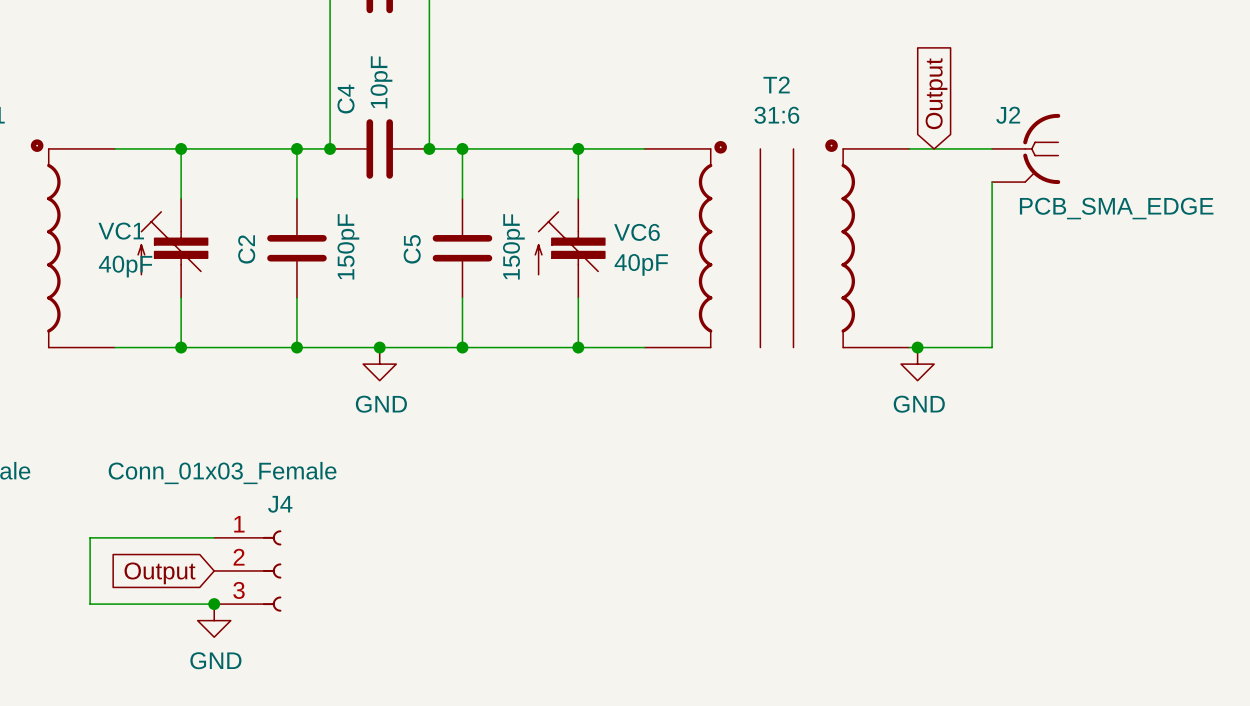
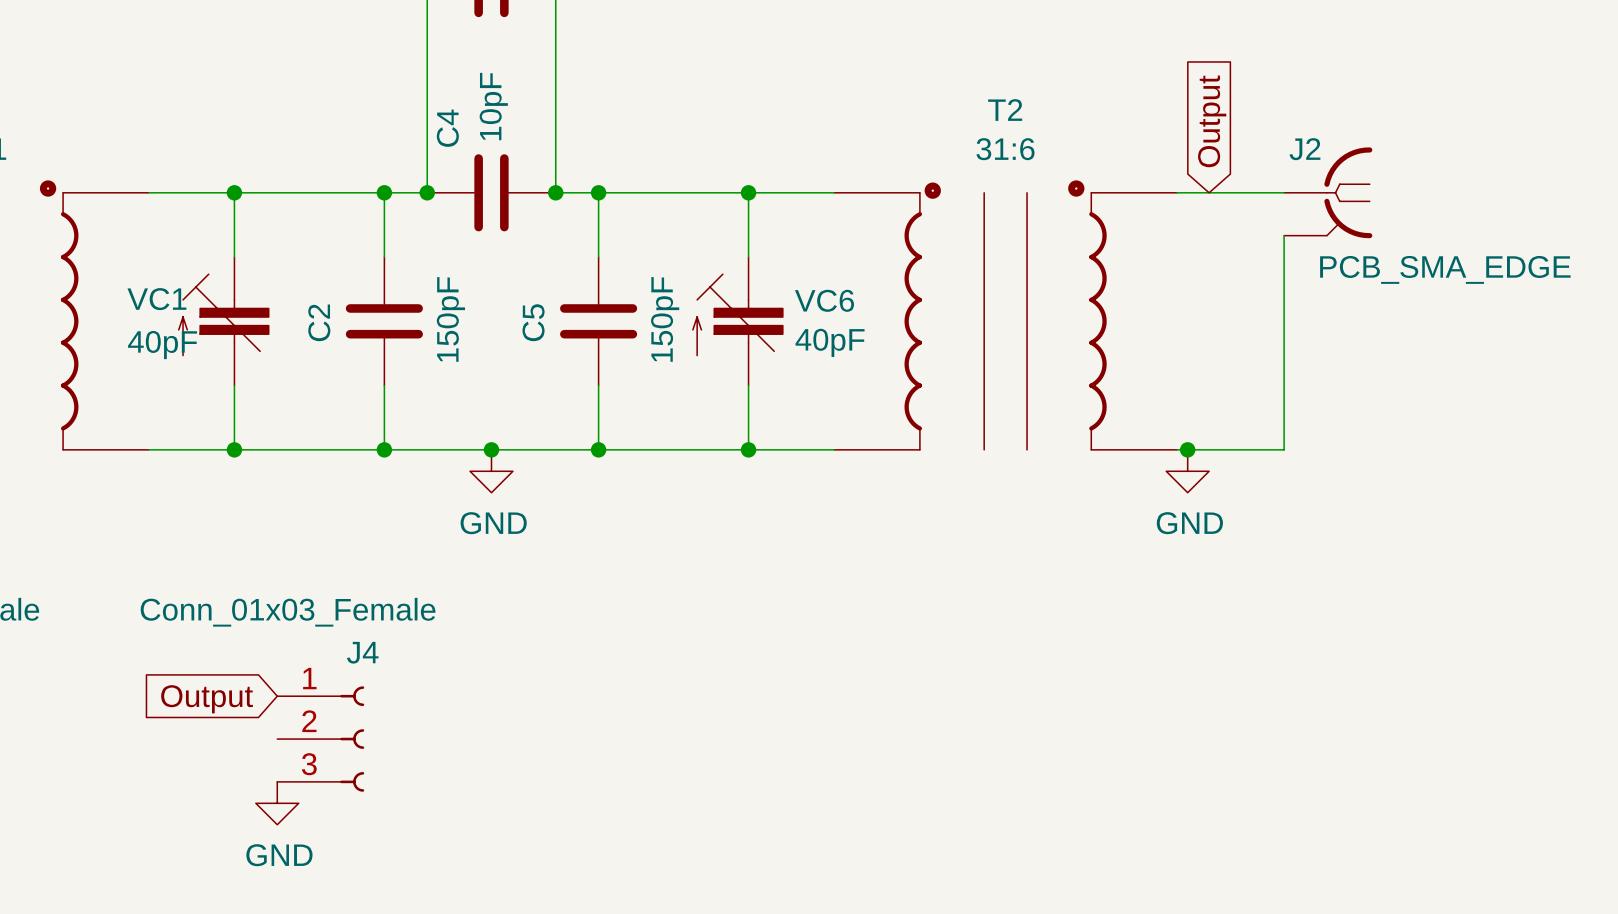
wire: (214, 537) (90, 537) (90, 604) (214, 604) -> none
global label position: Output (159, 573) -> Output (207, 699)
junction: (214, 604) -> none

